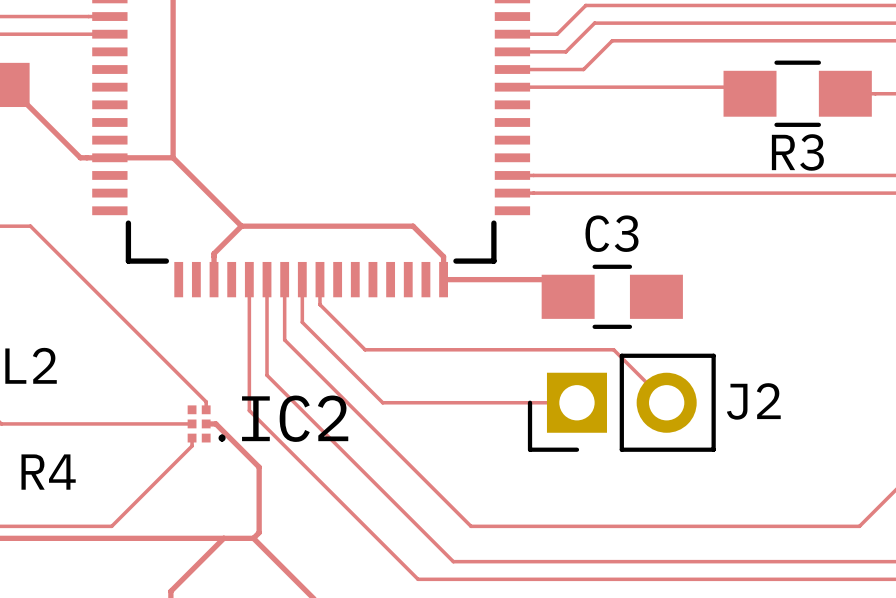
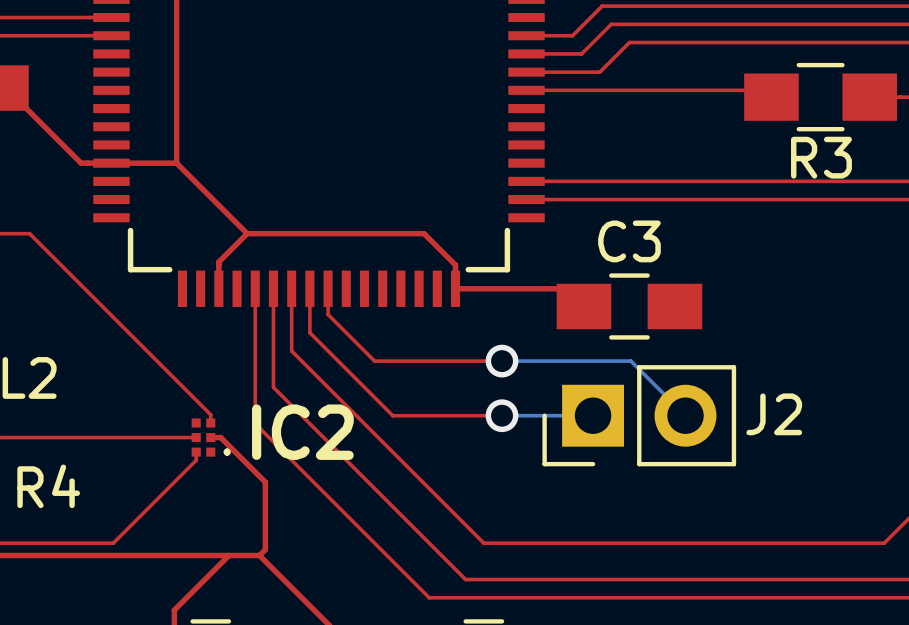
top track: (488, 349) (613, 349) (666, 402) -> none
bottom track: none -> (502, 361) (630, 361) (685, 415)
via: none -> (502, 361)
top track: (488, 402) (576, 402) -> none
bottom track: none -> (502, 415) (593, 415)
via: none -> (502, 415)

